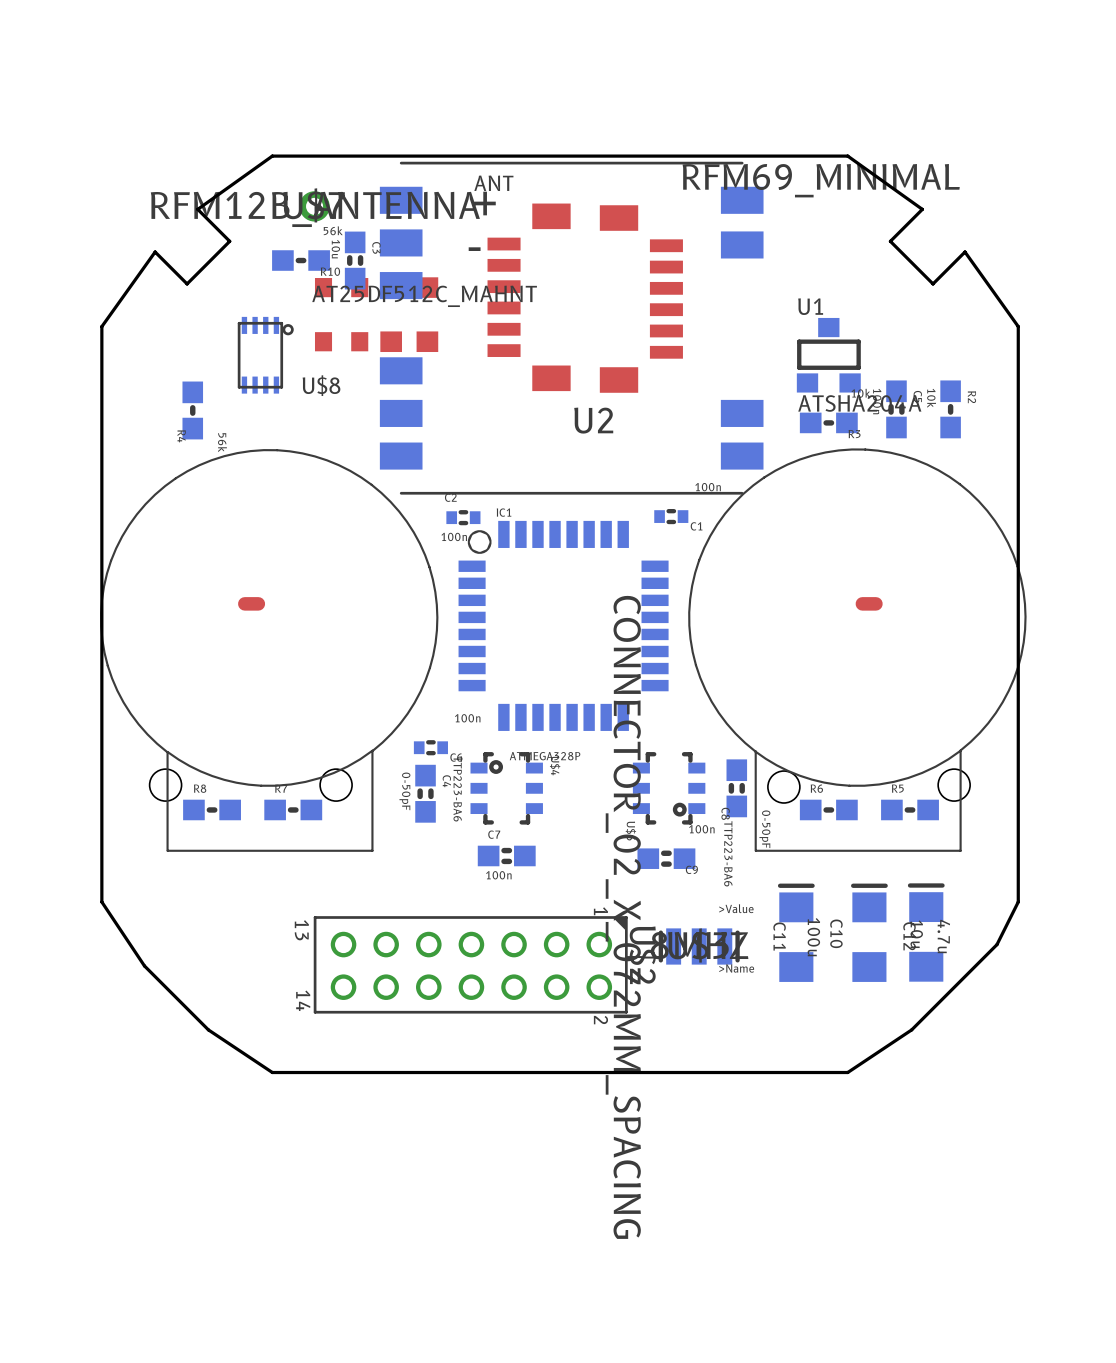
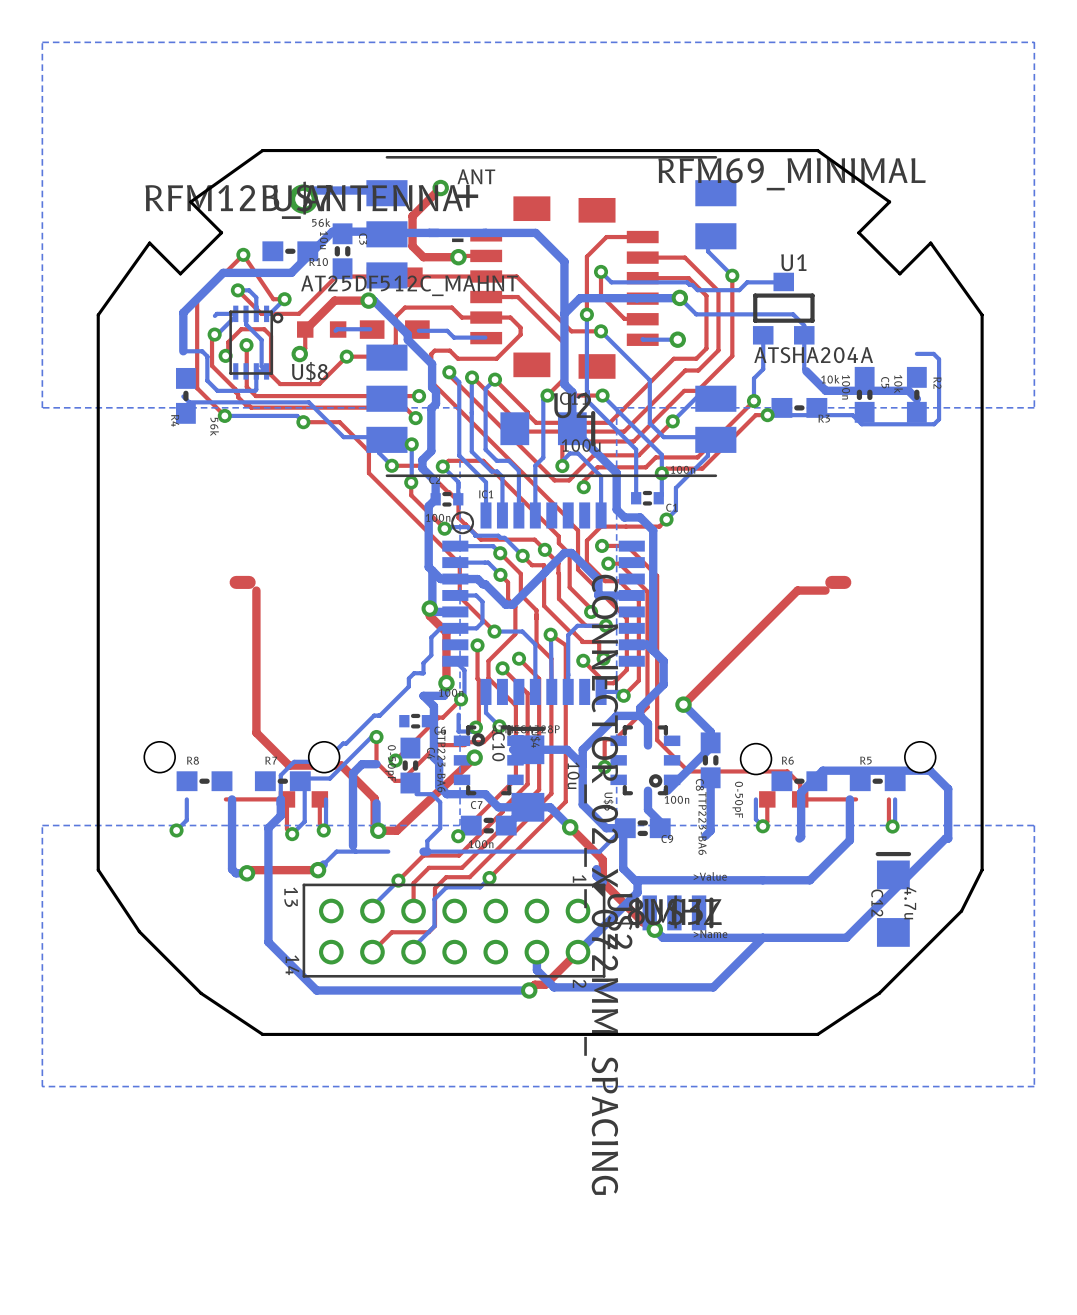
bottom zone outline: none -> (1034, 42) (1034, 407) (616, 407) (616, 825) (1034, 825) (1034, 1086) (42, 1086) (42, 825) (460, 825) (460, 407) (42, 407) (42, 42) (1034, 42)
top track: none -> (440, 188) (412, 216) (412, 246) (423, 257) (486, 255)
via: none -> (440, 188)
bottom track: none -> (379, 190) (311, 190) (303, 199)
bottom track: none -> (708, 233) (708, 251) (732, 275)
top track: none -> (642, 237) (606, 237) (586, 256) (586, 314)
via: none -> (243, 254)
via: none -> (458, 257)
top track: none -> (642, 257) (684, 257) (718, 291) (718, 350) (698, 370) (685, 370) (624, 431) (527, 431) (472, 377)
bottom track: none -> (601, 271) (611, 282) (687, 282) (697, 290) (739, 290) (747, 282) (783, 282)
top track: none -> (601, 271) (601, 295) (624, 318) (642, 318)
via: none -> (601, 271)
top track: none -> (732, 275) (732, 356) (697, 390) (684, 390) (633, 441) (562, 441)
via: none -> (732, 275)
part: (341, 287) -> none
top track: none -> (642, 278) (688, 278) (706, 295) (706, 348) (696, 358) (673, 358) (609, 422) (536, 422) (495, 379)
bottom track: none -> (237, 290) (249, 290) (256, 297) (256, 313)
top track: none -> (237, 290) (261, 313) (298, 313) (336, 276) (516, 276) (571, 331) (601, 331)
via: none -> (237, 290)
U1 name position: U1 (810, 306) -> U1 (793, 262)
top track: none -> (486, 297) (517, 297) (564, 343) (564, 384) (575, 395) (602, 395)
bottom track: none -> (678, 297) (696, 314) (793, 314) (804, 325) (804, 369) (825, 390) (908, 390) (916, 399)
via: none -> (679, 297)
bottom track: none -> (678, 298) (580, 298) (564, 313)
bottom track: none -> (284, 299) (269, 313) (266, 313)
top track: none -> (284, 299) (273, 299) (243, 254) (197, 301) (197, 388) (224, 415)
via: none -> (284, 299)
bottom track: none -> (368, 300) (373, 300) (407, 334) (407, 339) (432, 364) (432, 387) (436, 391) (436, 403) (431, 408) (431, 451) (422, 460) (422, 468) (435, 481) (435, 499) (428, 506) (428, 567) (440, 579) (477, 579) (505, 604) (512, 604) (564, 552) (571, 552) (598, 579) (598, 595) (631, 595)
top track: none -> (368, 300) (334, 300) (305, 329) (305, 348) (299, 354)
via: none -> (368, 300)
bottom track: none -> (235, 313) (235, 316) (217, 334) (214, 334)
bottom track: none -> (235, 313) (216, 313) (214, 315)
bottom track: none -> (246, 313) (246, 324) (261, 339) (261, 366) (266, 371) (256, 371) (255, 390) (217, 390) (207, 380) (207, 356) (202, 351) (183, 351) (183, 312) (223, 272) (291, 272) (332, 231) (535, 232) (564, 261) (564, 384) (572, 392) (572, 428) (616, 473) (616, 509) (624, 517) (640, 517) (653, 530) (653, 650)
bottom track: none -> (586, 314) (587, 401) (636, 449) (636, 498)
via: none -> (586, 314)
part footprint: [380, 331, 439, 353] -> [359, 320, 430, 339]
part footprint: [314, 332, 369, 352] -> [297, 321, 347, 338]
bottom track: none -> (370, 329) (335, 330)
bottom track: none -> (418, 330) (447, 330) (454, 337) (485, 337)
bottom track: none -> (601, 331) (649, 380) (649, 423) (663, 437) (707, 437) (707, 455) (675, 487) (675, 510) (666, 519)
via: none -> (601, 331)
top track: none -> (214, 334) (212, 337) (212, 365) (235, 389) (238, 397) (251, 407) (405, 407) (415, 418)
via: none -> (214, 334)
bottom track: none -> (763, 335) (763, 369) (753, 378) (753, 401)
bottom track: none -> (642, 339) (677, 339)
via: none -> (677, 339)
U1 position: (828, 355) -> (783, 308)
via: none -> (246, 345)
top track: none -> (246, 345) (246, 386) (255, 396) (419, 396)
bottom track: none -> (916, 353) (933, 353) (939, 359) (939, 419) (934, 424) (861, 424) (852, 415) (767, 415)
via: none -> (299, 354)
top track: none -> (225, 355) (228, 353) (228, 342) (241, 329) (264, 329) (271, 336) (271, 374) (280, 384) (319, 384) (346, 356) (383, 356) (395, 344) (395, 316) (404, 307) (451, 307) (461, 317) (510, 317) (520, 327) (520, 334) (496, 358) (457, 358) (449, 350) (434, 350) (431, 354) (431, 381) (569, 520) (578, 530) (578, 569) (626, 618) (626, 669) (613, 683) (605, 683) (583, 660)
via: none -> (225, 355)
via: none -> (346, 356)
bottom track: none -> (449, 372) (459, 382) (459, 455) (486, 482) (486, 515)
top track: none -> (449, 372) (449, 375) (554, 480) (569, 480) (593, 455) (638, 455) (672, 421)
via: none -> (449, 372)
bottom track: none -> (471, 377) (471, 451) (491, 471) (497, 471) (502, 476) (502, 515)
via: none -> (472, 377)
top track: none -> (564, 378) (547, 395)
bottom track: none -> (495, 379) (485, 389) (485, 449) (496, 460) (508, 460) (518, 470) (518, 515)
via: none -> (495, 379)
via: none -> (419, 396)
bottom track: none -> (547, 395) (543, 399) (543, 457) (535, 465) (535, 515)
via: none -> (547, 395)
bottom track: none -> (602, 395) (661, 454) (661, 495) (658, 498)
via: none -> (602, 395)
bottom track: none -> (707, 396) (698, 396) (672, 421)
bottom track: none -> (183, 396) (189, 402) (308, 402) (343, 437) (379, 437) (379, 453) (391, 465)
top track: none -> (753, 401) (697, 457) (655, 457) (645, 467) (597, 467) (583, 481) (583, 487)
via: none -> (753, 401)
top track: none -> (767, 415) (755, 415) (702, 468) (666, 468) (661, 473)
via: none -> (767, 415)
bottom track: none -> (224, 415) (297, 415) (303, 422)
via: none -> (224, 415)
via: none -> (415, 418)
via: none -> (672, 421)
top track: none -> (303, 422) (339, 422) (368, 451) (368, 473) (459, 563) (459, 596) (494, 631)
via: none -> (303, 422)
drawing: [100, 448, 1027, 852] -> none
top track: none -> (562, 441) (562, 466)
bottom track: none -> (411, 444) (411, 482)
via: none -> (411, 444)
top track: none -> (391, 465) (421, 465) (458, 501) (458, 517) (480, 539) (534, 539) (558, 563) (558, 598) (585, 625) (605, 625)
via: none -> (391, 465)
bottom track: none -> (442, 466) (458, 482) (457, 499)
top track: none -> (442, 466) (448, 460) (483, 460) (558, 536) (558, 543) (569, 554) (569, 587) (591, 608) (591, 611)
via: none -> (442, 466)
bottom track: none -> (562, 466) (562, 461) (569, 453) (578, 453) (601, 476) (601, 515)
via: none -> (562, 466)
via: none -> (661, 473)
top track: none -> (411, 482) (411, 495) (444, 528)
via: none -> (411, 482)
via: none -> (583, 487)
top track: none -> (666, 519) (659, 526) (601, 526) (586, 540) (586, 562) (605, 581) (619, 581) (638, 600) (638, 680) (623, 695)
via: none -> (666, 519)
bottom track: none -> (444, 528) (467, 527) (475, 535)
via: none -> (444, 528)
bottom track: none -> (475, 535) (498, 535) (504, 537) (522, 555)
bottom track: none -> (455, 546) (493, 546) (500, 553)
top track: none -> (602, 545) (627, 545) (657, 575) (657, 740) (688, 771) (787, 771) (800, 784) (800, 799) (856, 799)
via: none -> (602, 545)
via: none -> (544, 549)
top track: none -> (500, 553) (520, 573) (520, 594) (536, 610) (536, 643) (551, 658) (551, 793) (469, 877) (446, 877) (434, 888) (434, 926) (428, 932) (391, 932) (372, 951)
via: none -> (500, 553)
top track: none -> (522, 555) (532, 565) (544, 565) (544, 605) (582, 641) (599, 641) (599, 654) (603, 658)
via: none -> (522, 555)
bottom track: none -> (455, 562) (488, 562) (500, 574)
top track: none -> (608, 563) (619, 563) (647, 591) (647, 707) (615, 739) (604, 739)
via: none -> (608, 563)
bottom track: none -> (432, 570) (432, 608) (435, 611) (455, 611)
top track: none -> (500, 574) (508, 582) (508, 599) (515, 606) (515, 634) (488, 661) (488, 678) (515, 705) (515, 778) (458, 836)
via: none -> (500, 574)
top track: none -> (256, 590) (256, 732) (289, 765) (341, 765) (374, 798) (374, 827) (378, 830) (396, 830) (474, 757)
top track: none -> (825, 590) (797, 590) (683, 704)
bottom track: none -> (455, 595) (476, 595) (482, 601) (482, 622) (476, 628) (440, 628) (431, 637) (431, 655) (423, 663) (423, 673) (414, 673) (408, 678) (408, 686) (379, 715) (374, 715) (324, 761) (294, 761) (280, 775) (280, 815) (268, 828) (268, 942) (316, 990) (529, 990)
via: none -> (429, 608)
top track: none -> (428, 610) (429, 608) (429, 615) (446, 632) (446, 683)
via: none -> (591, 611)
bottom track: none -> (605, 625) (577, 625) (568, 635) (568, 691)
via: none -> (605, 625)
bottom track: none -> (494, 631) (522, 631) (535, 644) (535, 691)
via: none -> (494, 631)
bottom track: none -> (550, 634) (551, 691)
top track: none -> (550, 634) (565, 645) (565, 801) (489, 877)
via: none -> (550, 634)
bottom track: none -> (631, 644) (647, 644) (663, 661) (663, 684) (640, 708) (640, 715)
top track: none -> (477, 645) (478, 724) (475, 727)
via: none -> (477, 645)
top track: none -> (519, 658) (539, 678) (539, 789) (518, 811)
via: none -> (519, 658)
via: none -> (603, 658)
bottom track: none -> (455, 661) (464, 670) (464, 696) (461, 699)
via: none -> (583, 660)
top track: none -> (502, 668) (527, 693) (527, 784) (502, 809) (502, 812)
via: none -> (502, 668)
bottom track: none -> (446, 683) (444, 695) (423, 695) (433, 706) (433, 757) (439, 762) (439, 786) (446, 794) (485, 794) (498, 807) (550, 807) (570, 827)
via: none -> (446, 683)
bottom track: none -> (486, 691) (486, 712) (499, 726)
bottom track: none -> (601, 691) (619, 691) (623, 695)
via: none -> (623, 695)
top track: none -> (461, 699) (442, 717) (438, 717) (395, 760)
via: none -> (461, 699)
bottom track: none -> (683, 704) (710, 731) (710, 747) (667, 790)
via: none -> (683, 704)
bottom track: none -> (458, 714) (458, 731) (472, 731) (475, 727)
bottom track: none -> (640, 715) (616, 715) (582, 749) (582, 804) (606, 828) (623, 828)
bottom track: none -> (640, 715) (647, 723) (647, 745)
top track: none -> (499, 726) (483, 742) (467, 742) (464, 745) (437, 745) (401, 780) (395, 780) (376, 762) (376, 737)
via: none -> (499, 726)
via: none -> (475, 727)
bottom track: none -> (376, 737) (374, 734) (330, 778) (304, 779) (304, 821) (292, 834)
via: none -> (376, 737)
top track: none -> (604, 738) (604, 767)
bottom track: none -> (513, 749) (567, 749) (582, 765)
via: none -> (474, 757)
via: none -> (395, 760)
bottom track: none -> (376, 764) (362, 764) (353, 773) (353, 848) (355, 851)
via: none -> (604, 767)
bottom track: none -> (710, 779) (710, 830) (705, 835)
bottom track: none -> (647, 790) (647, 809) (662, 824) (662, 828)
bottom track: none -> (416, 794) (432, 794) (440, 802) (440, 828) (427, 840) (427, 851)
bottom track: none -> (186, 799) (186, 820) (176, 830)
top track: none -> (225, 799) (286, 799) (286, 828) (292, 834)
bottom track: none -> (232, 799) (232, 869) (236, 873) (247, 873)
part: none -> (303, 799)
top track: none -> (319, 799) (319, 826) (323, 830)
bottom track: none -> (326, 799) (326, 828) (323, 830)
bottom track: none -> (755, 799) (755, 819) (762, 826)
top track: none -> (767, 799) (767, 821) (762, 826)
part: none -> (783, 799)
bottom track: none -> (849, 799) (849, 840) (809, 880) (634, 880) (623, 868) (623, 828)
top track: none -> (888, 799) (888, 822) (892, 826)
bottom track: none -> (895, 799) (895, 824) (892, 826)
bottom track: none -> (376, 803) (376, 828) (378, 830)
top track: none -> (519, 810) (462, 867) (428, 867) (413, 883) (413, 911)
top track: none -> (502, 811) (458, 855) (423, 855) (398, 880)
via: none -> (762, 826)
via: none -> (892, 826)
top track: none -> (570, 827) (602, 859) (602, 882) (643, 922) (647, 922) (654, 929)
via: none -> (570, 827)
bottom track: none -> (623, 828) (599, 851) (427, 851)
via: none -> (176, 830)
via: none -> (323, 830)
via: none -> (378, 830)
via: none -> (292, 834)
via: none -> (458, 836)
bottom track: none -> (799, 838) (801, 836) (801, 792) (822, 770) (929, 770) (948, 788) (948, 838) (945, 838) (846, 937) (662, 937) (654, 929)
bottom track: none -> (388, 851) (336, 851) (318, 870)
bottom track: none -> (427, 851) (423, 851)
bottom track: none -> (596, 869) (596, 875) (602, 882)
top track: none -> (318, 870) (250, 870) (247, 873)
via: none -> (318, 870)
via: none -> (247, 873)
bottom track: none -> (489, 877) (480, 887) (446, 887) (434, 899) (434, 926) (413, 947) (413, 952)
via: none -> (489, 877)
bottom track: none -> (637, 880) (637, 892) (578, 952)
bottom track: none -> (398, 880) (372, 906) (372, 911)
via: none -> (398, 880)
C11 rotation: 0° (796, 932) -> 90° clockwise (547, 428)
C11 position: (796, 932) -> (547, 428)
C10 position: (869, 932) -> (527, 774)
C10 name position: C10 (836, 933) -> C10 (498, 746)
via: none -> (654, 929)
bottom track: none -> (762, 937) (713, 987) (554, 987) (536, 970) (536, 952)
top track: none -> (578, 952) (545, 984) (534, 984) (529, 990)
via: none -> (529, 990)

